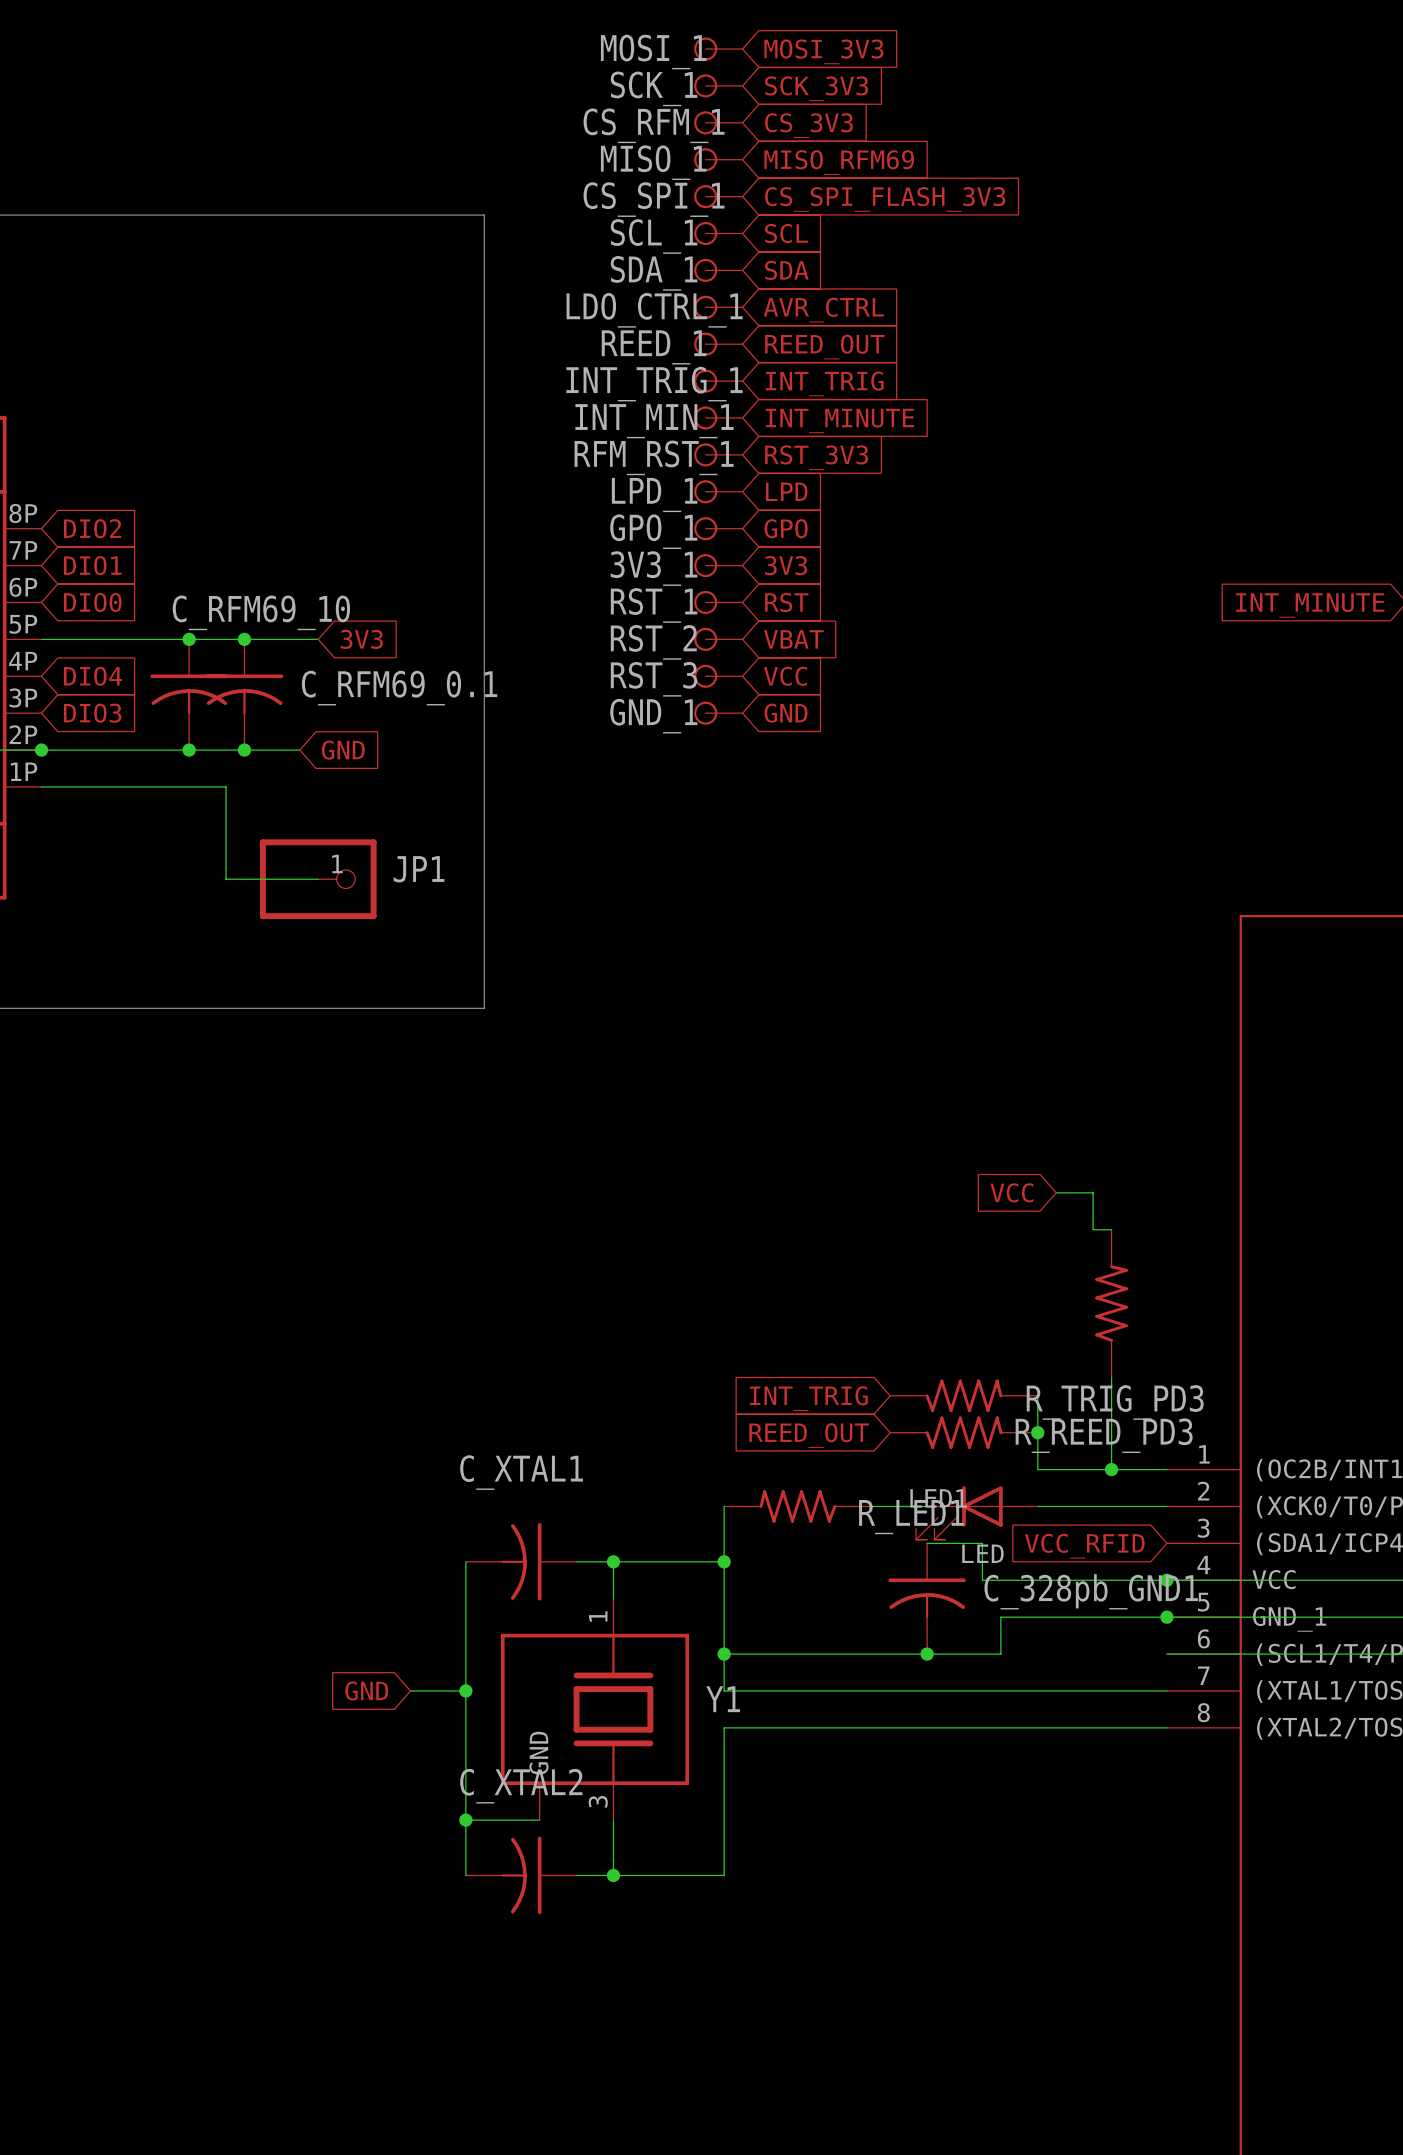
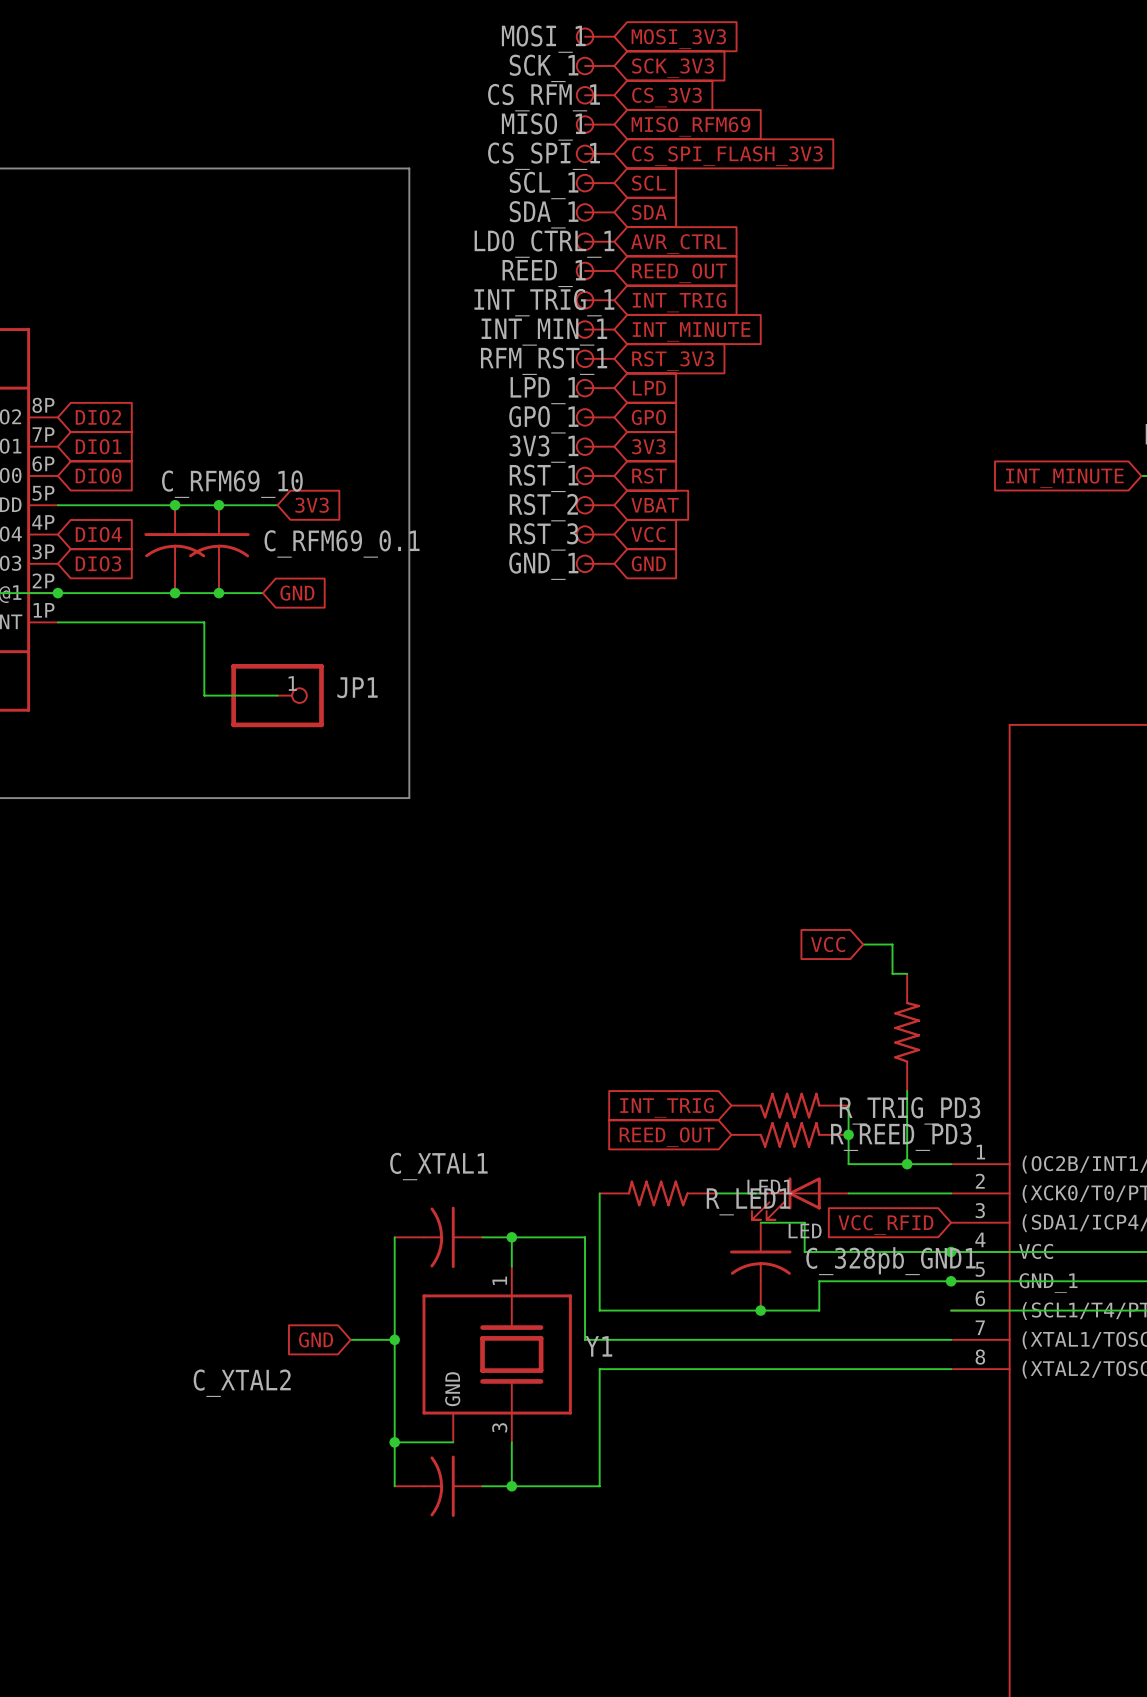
wire: (705, 1561) (724, 1561) -> none
junction: (724, 1561) -> none
wire: (724, 1654) (724, 1690) -> (585, 1237) (585, 1339) (599, 1339)
junction: (724, 1654) -> none
C_XTAL2 name position: C_XTAL2 (521, 1786) -> C_XTAL2 (242, 1383)

